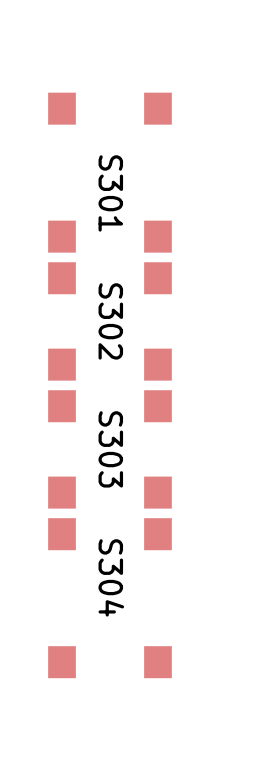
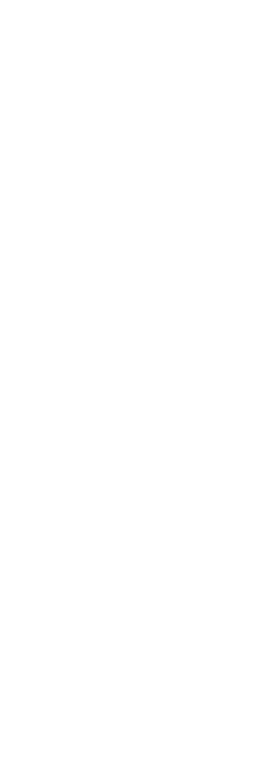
S301: (109, 193) -> none
S302: (109, 321) -> none
S303: (109, 449) -> none
S304: (109, 577) -> none

